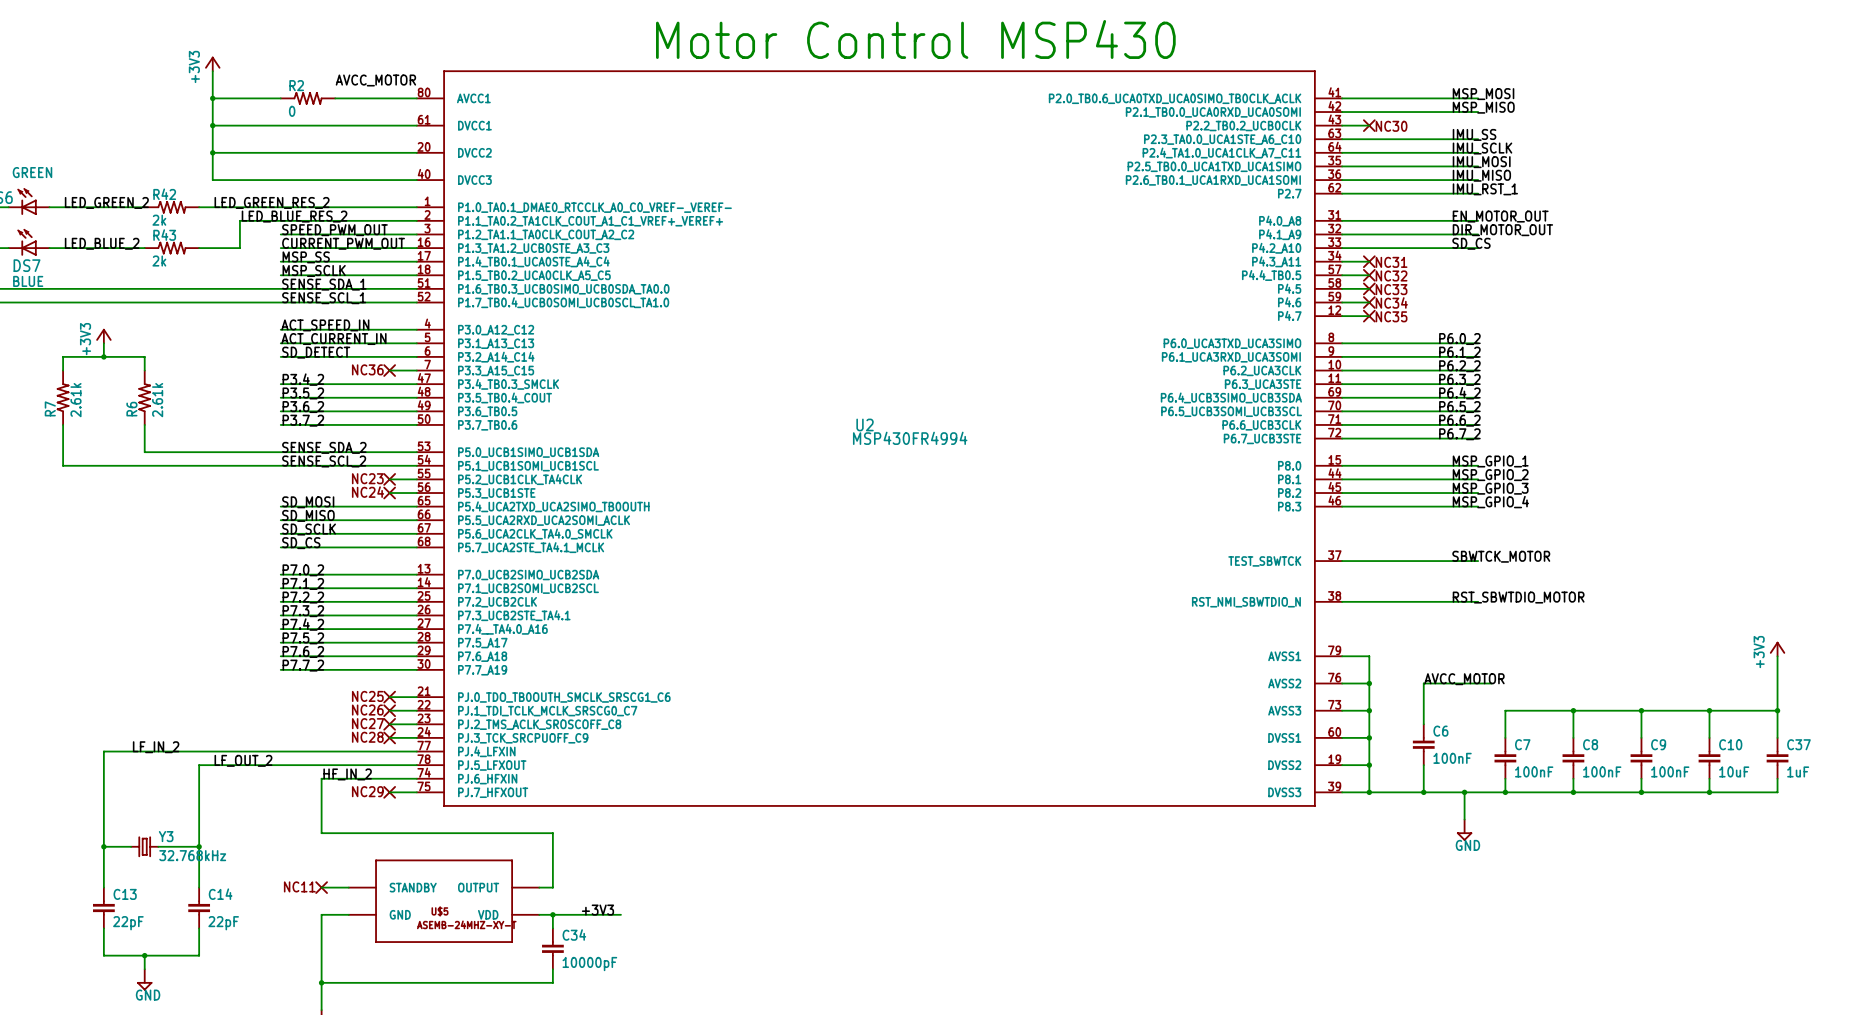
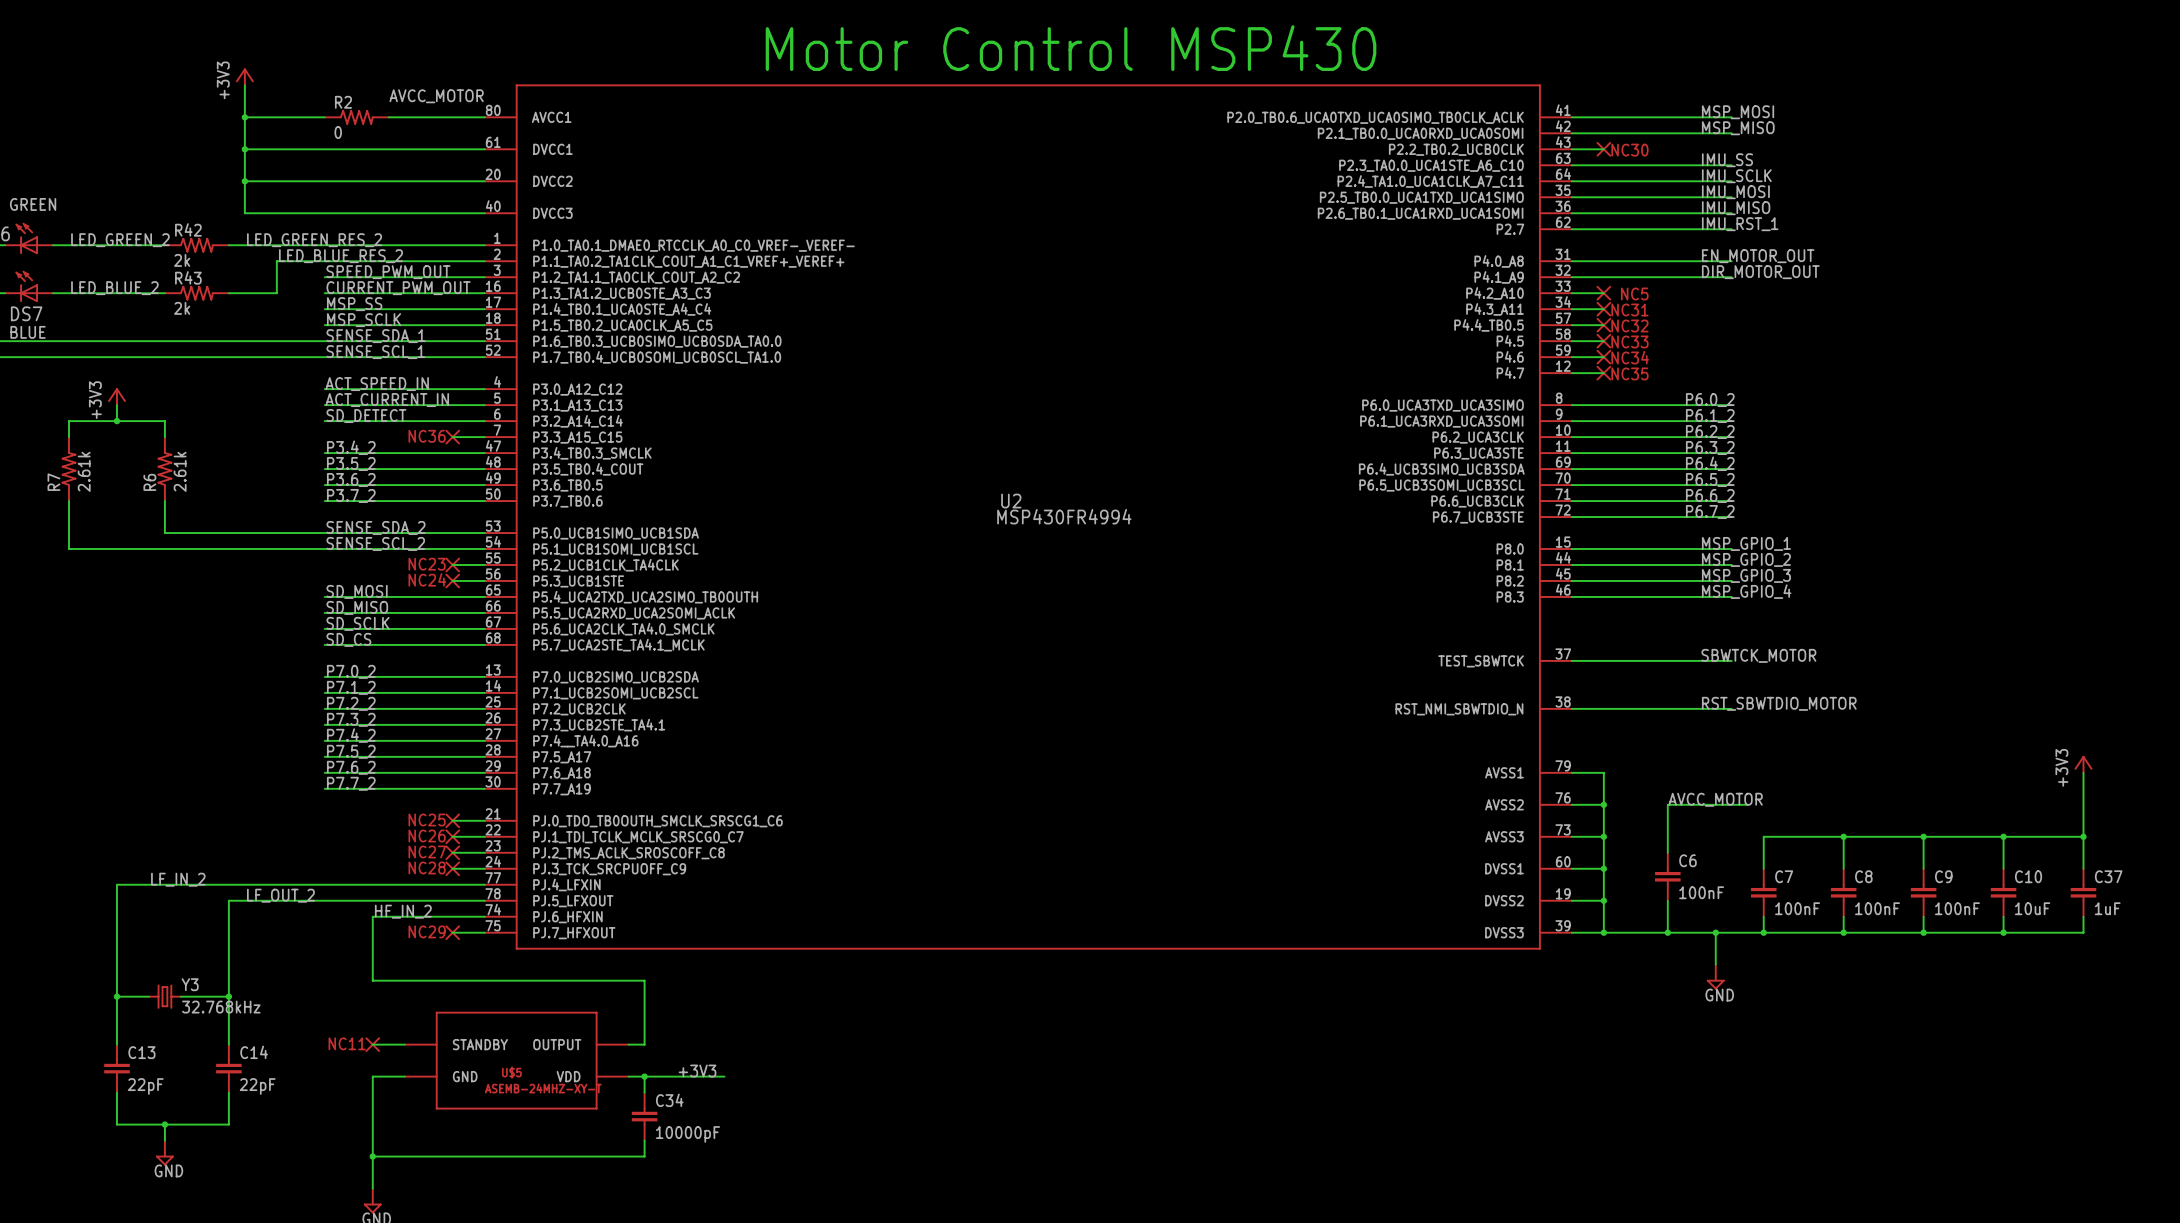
label: SD_CS (1471, 243) -> none
wire: (1369, 248) (1478, 248) -> none
NC5: none -> (1603, 293)

